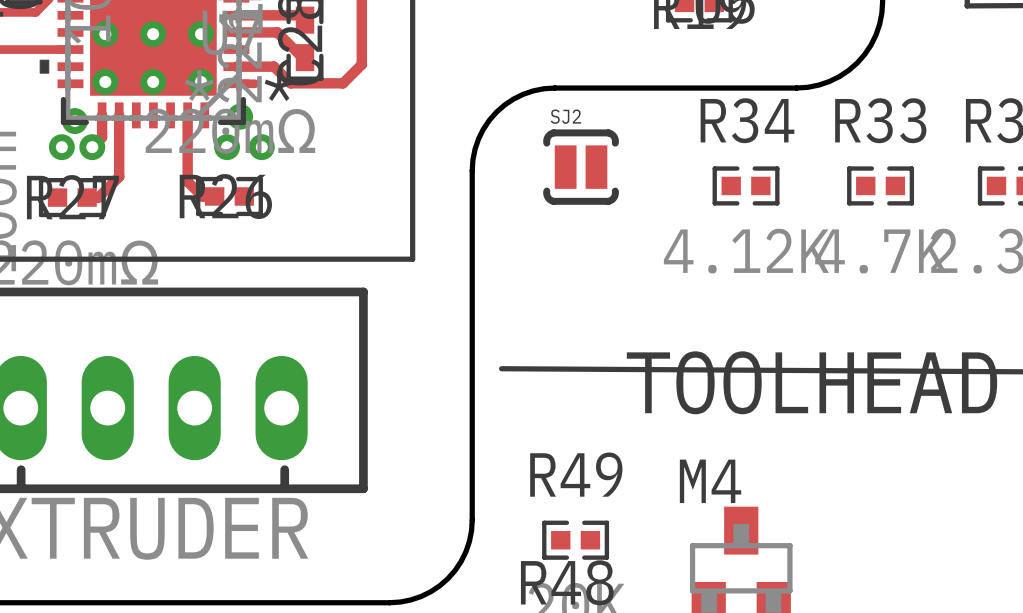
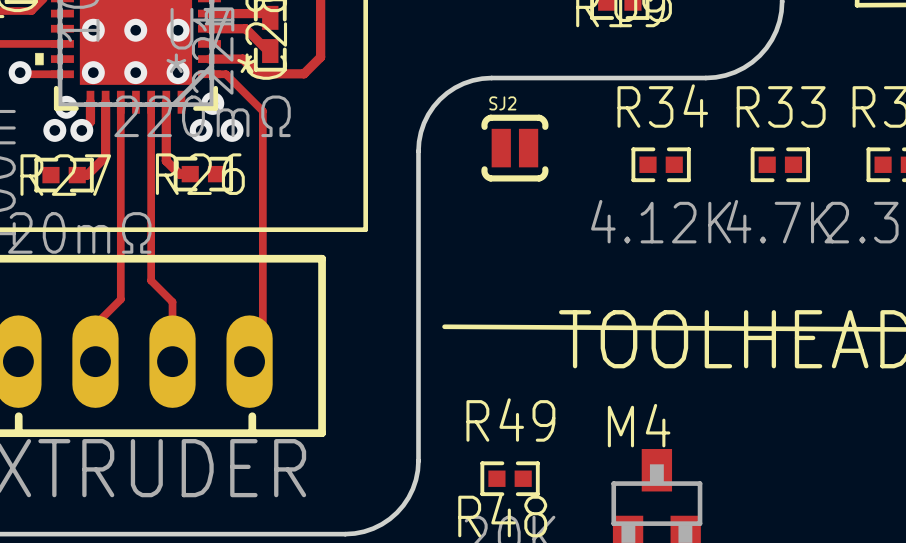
track: none -> (20, 72) (21, 74) (62, 74)
via: none -> (20, 72)
track: none -> (225, 74) (262, 111) (262, 348) (249, 361)
track: none -> (120, 102) (120, 299) (95, 324) (95, 361)
track: none -> (151, 102) (151, 280) (172, 302) (172, 361)

